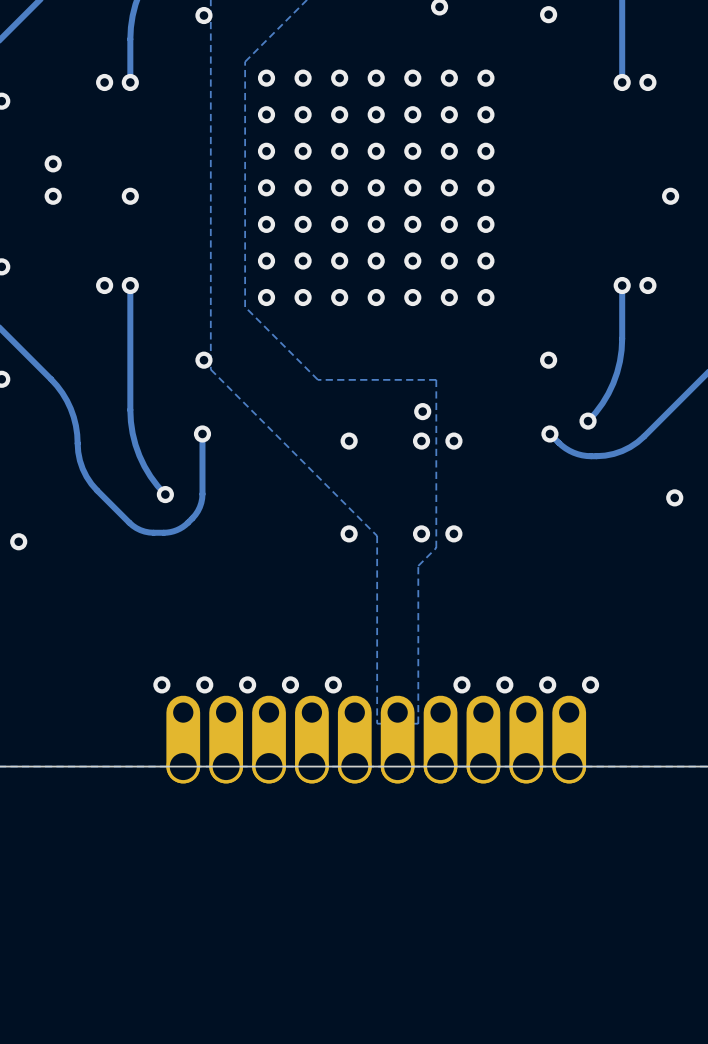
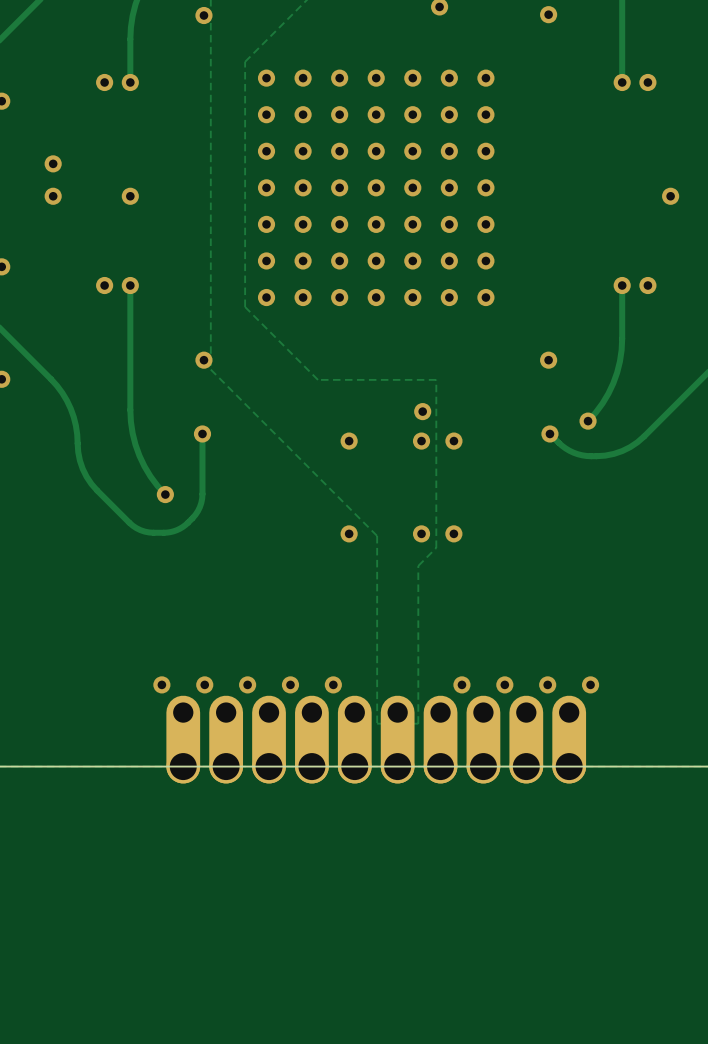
via: (674, 497) -> none
via: (18, 541) -> none

